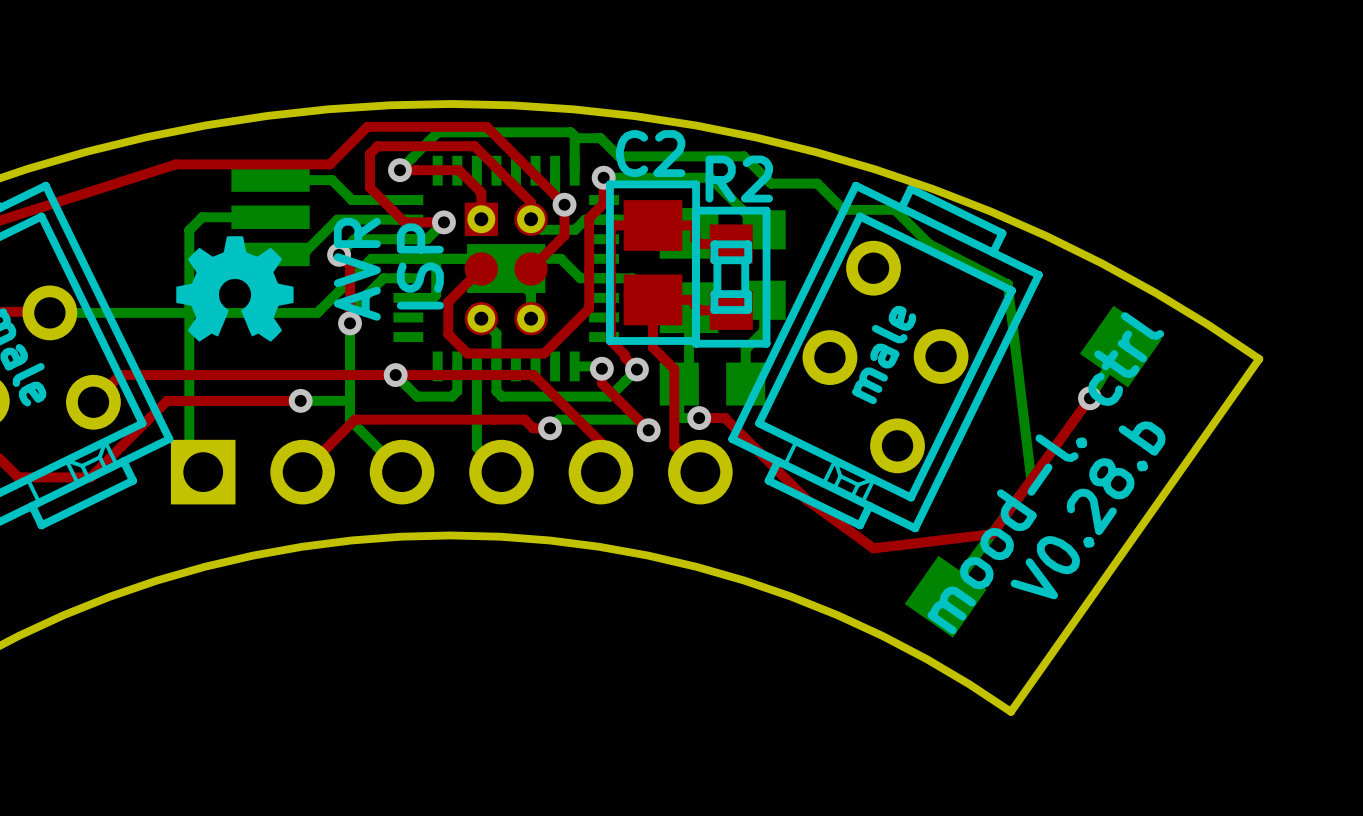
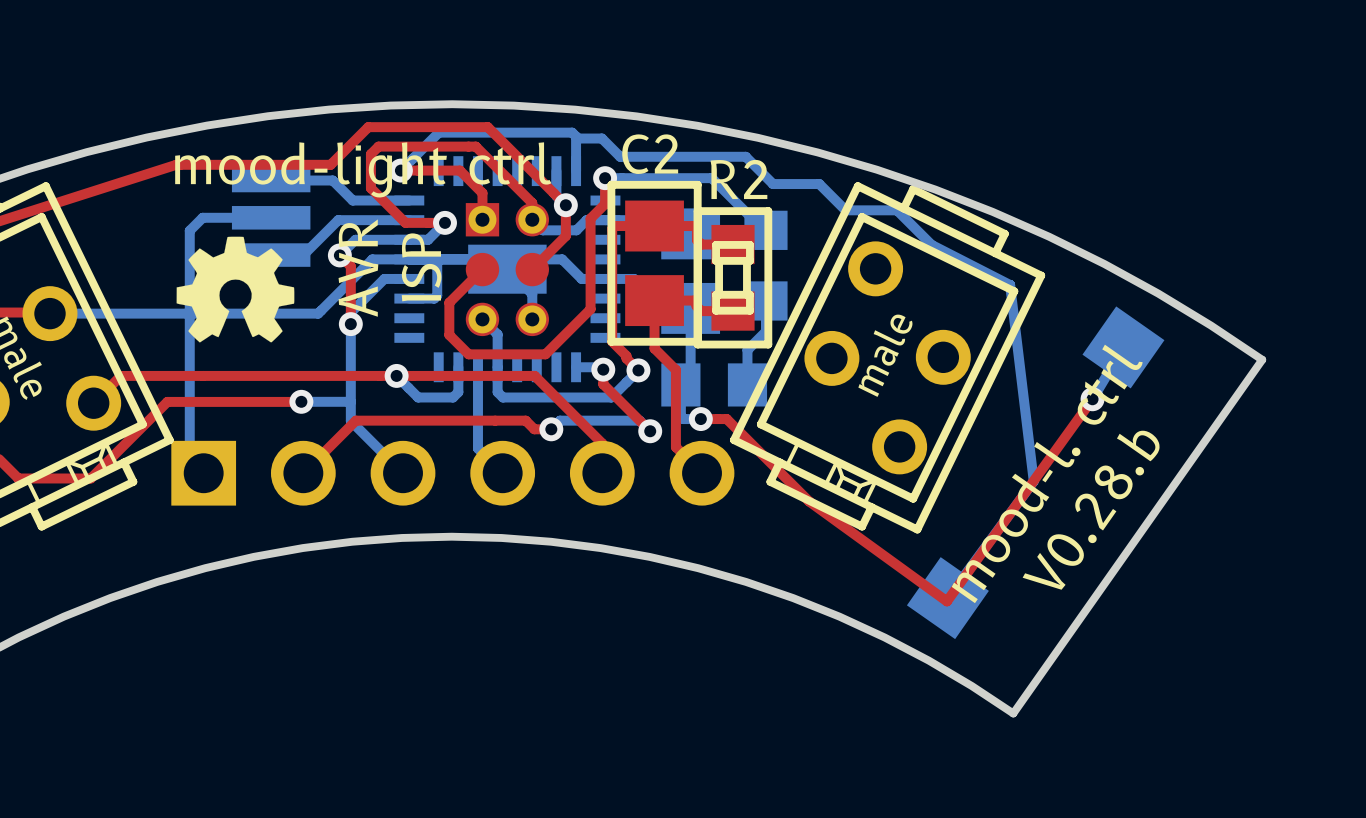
text: none -> mood-light ctrl (363, 169)
top track: (992, 534) (873, 548) -> (995, 534) (946, 601) (875, 549)

